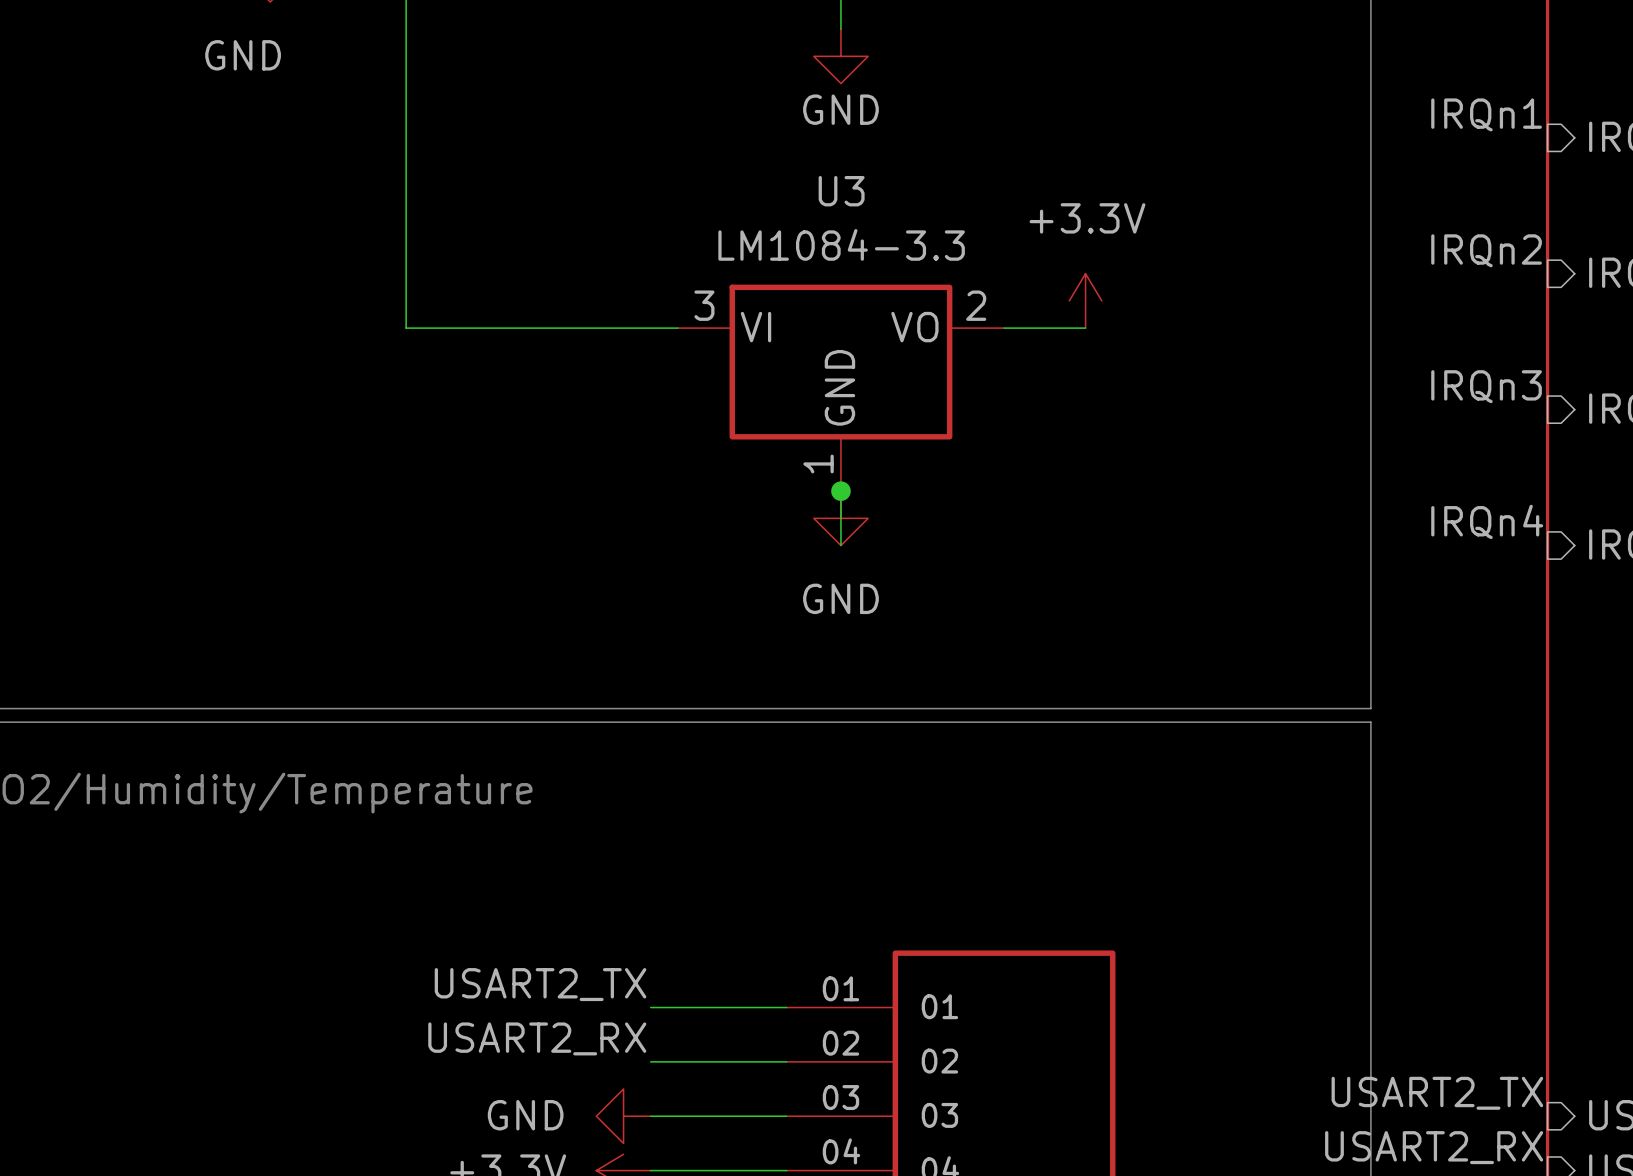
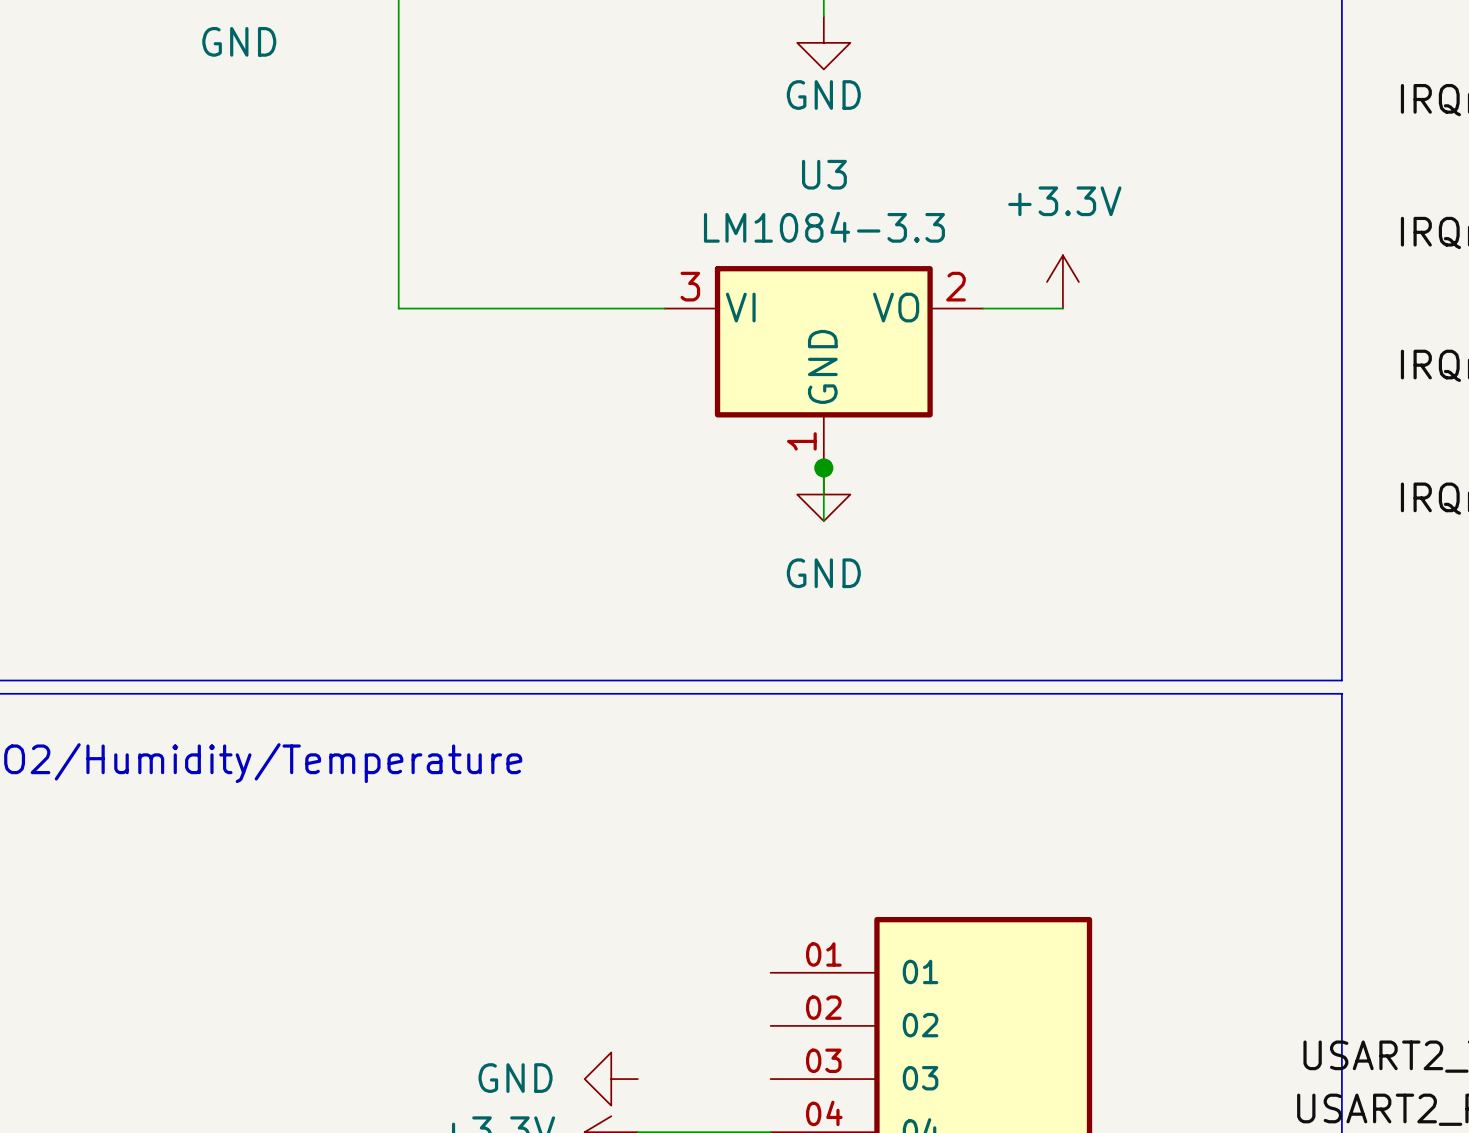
label: USART2_TX (540, 984) -> none
wire: (650, 1007) (786, 1007) -> none
label: USART2_RX (537, 1038) -> none
wire: (650, 1061) (786, 1061) -> none
wire: (650, 1116) (786, 1116) -> none

